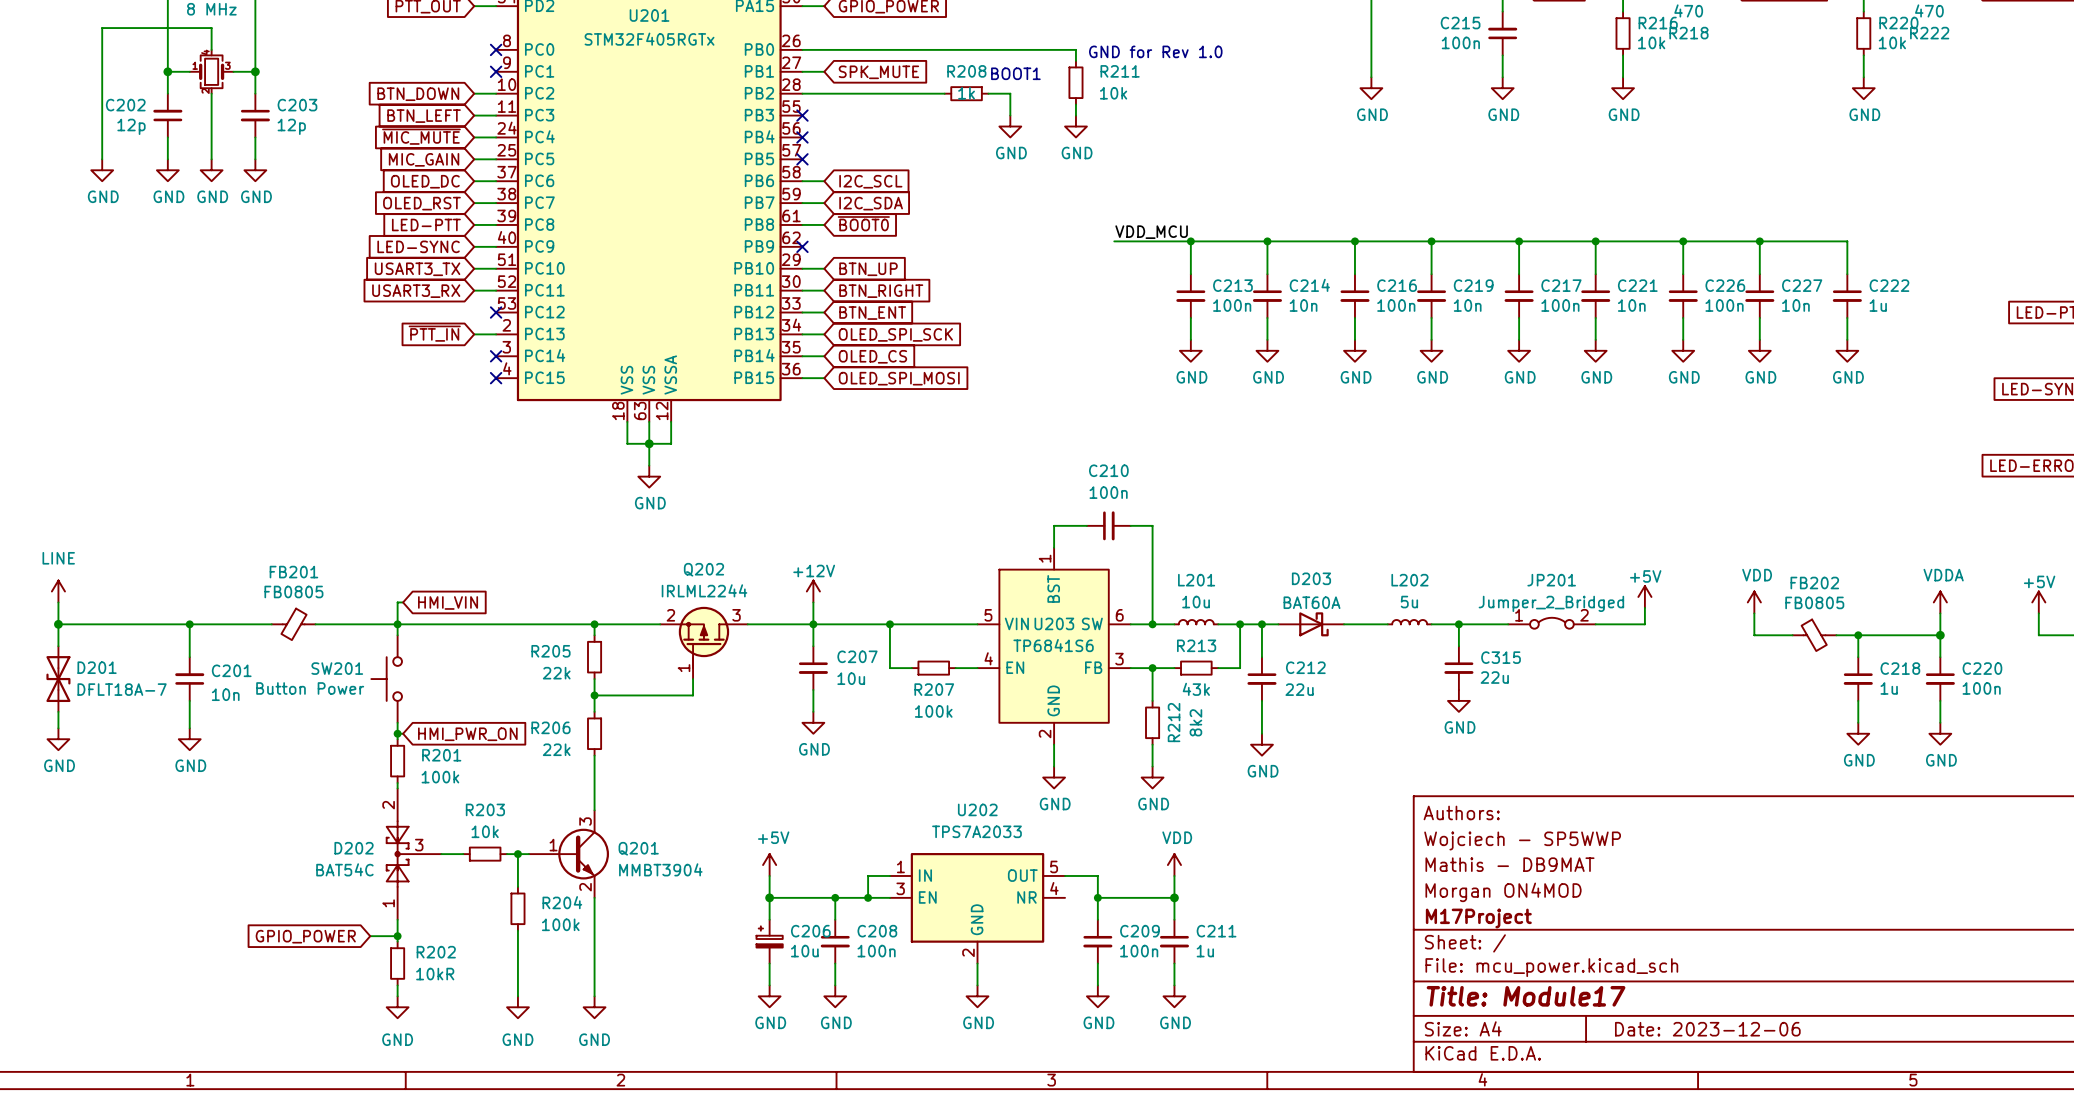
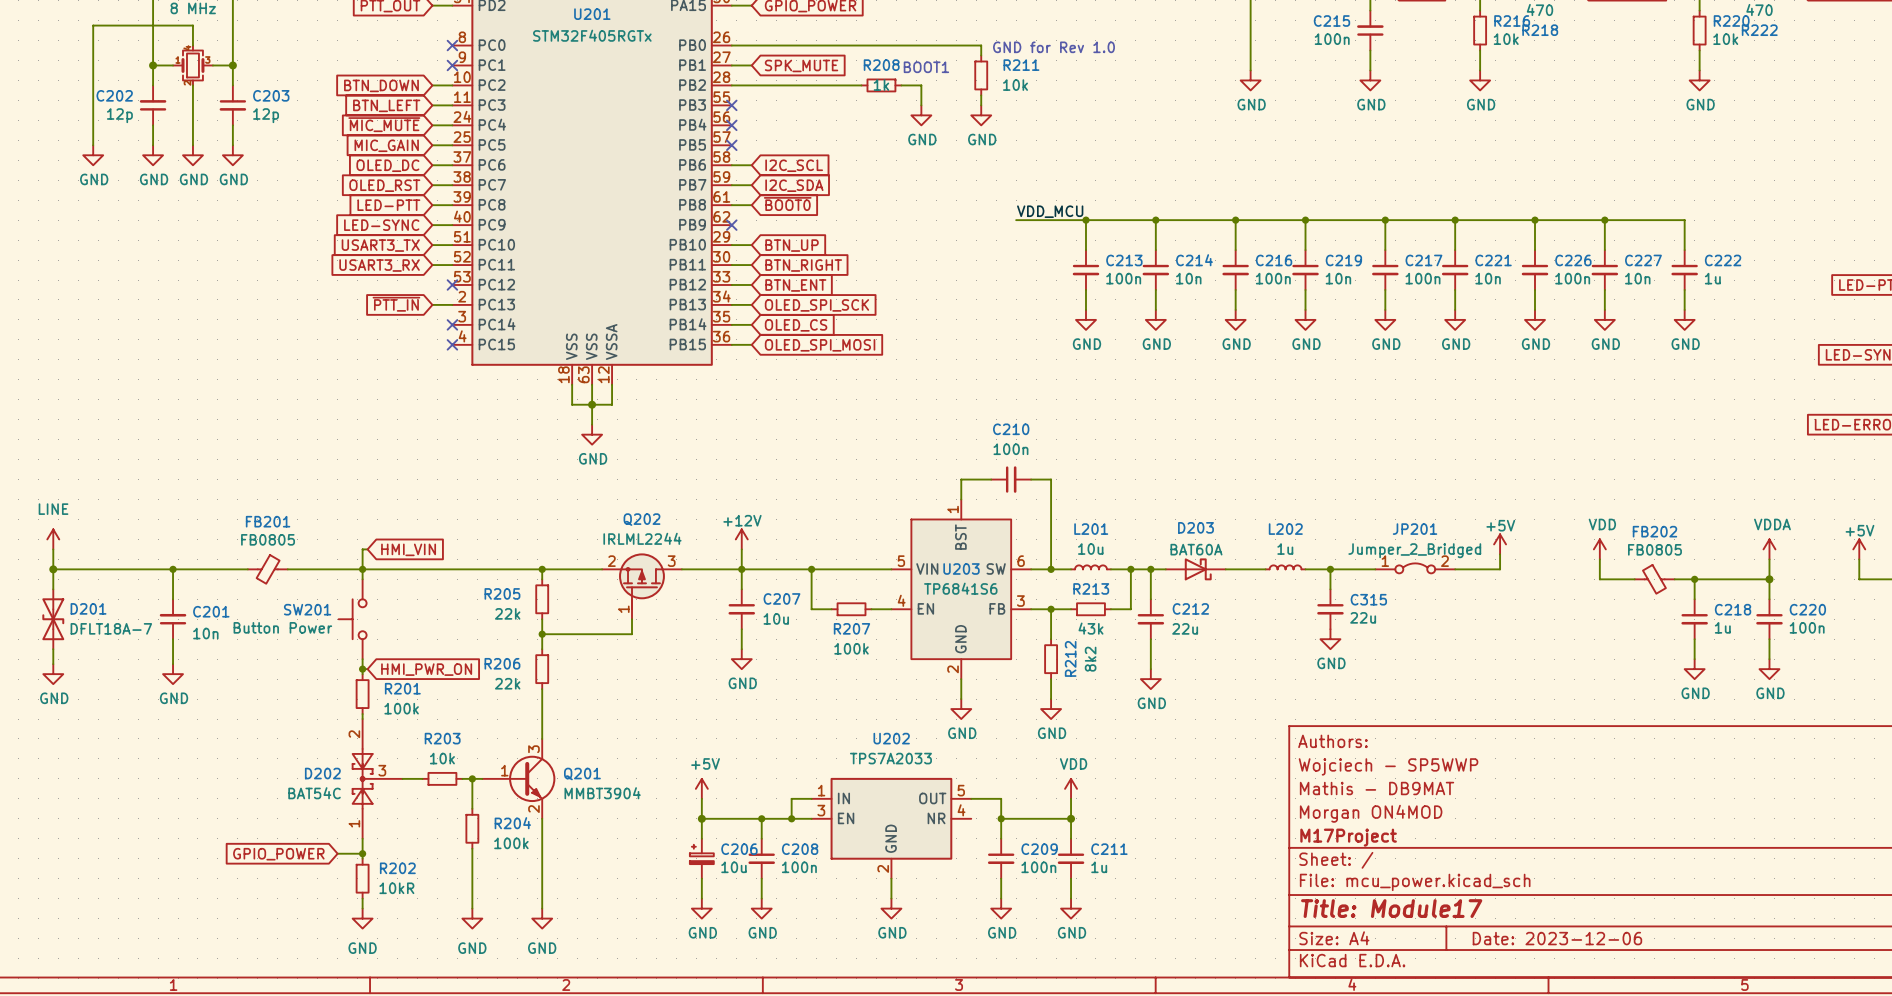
L202 value: 5u (1409, 602) -> 1u (1285, 549)

